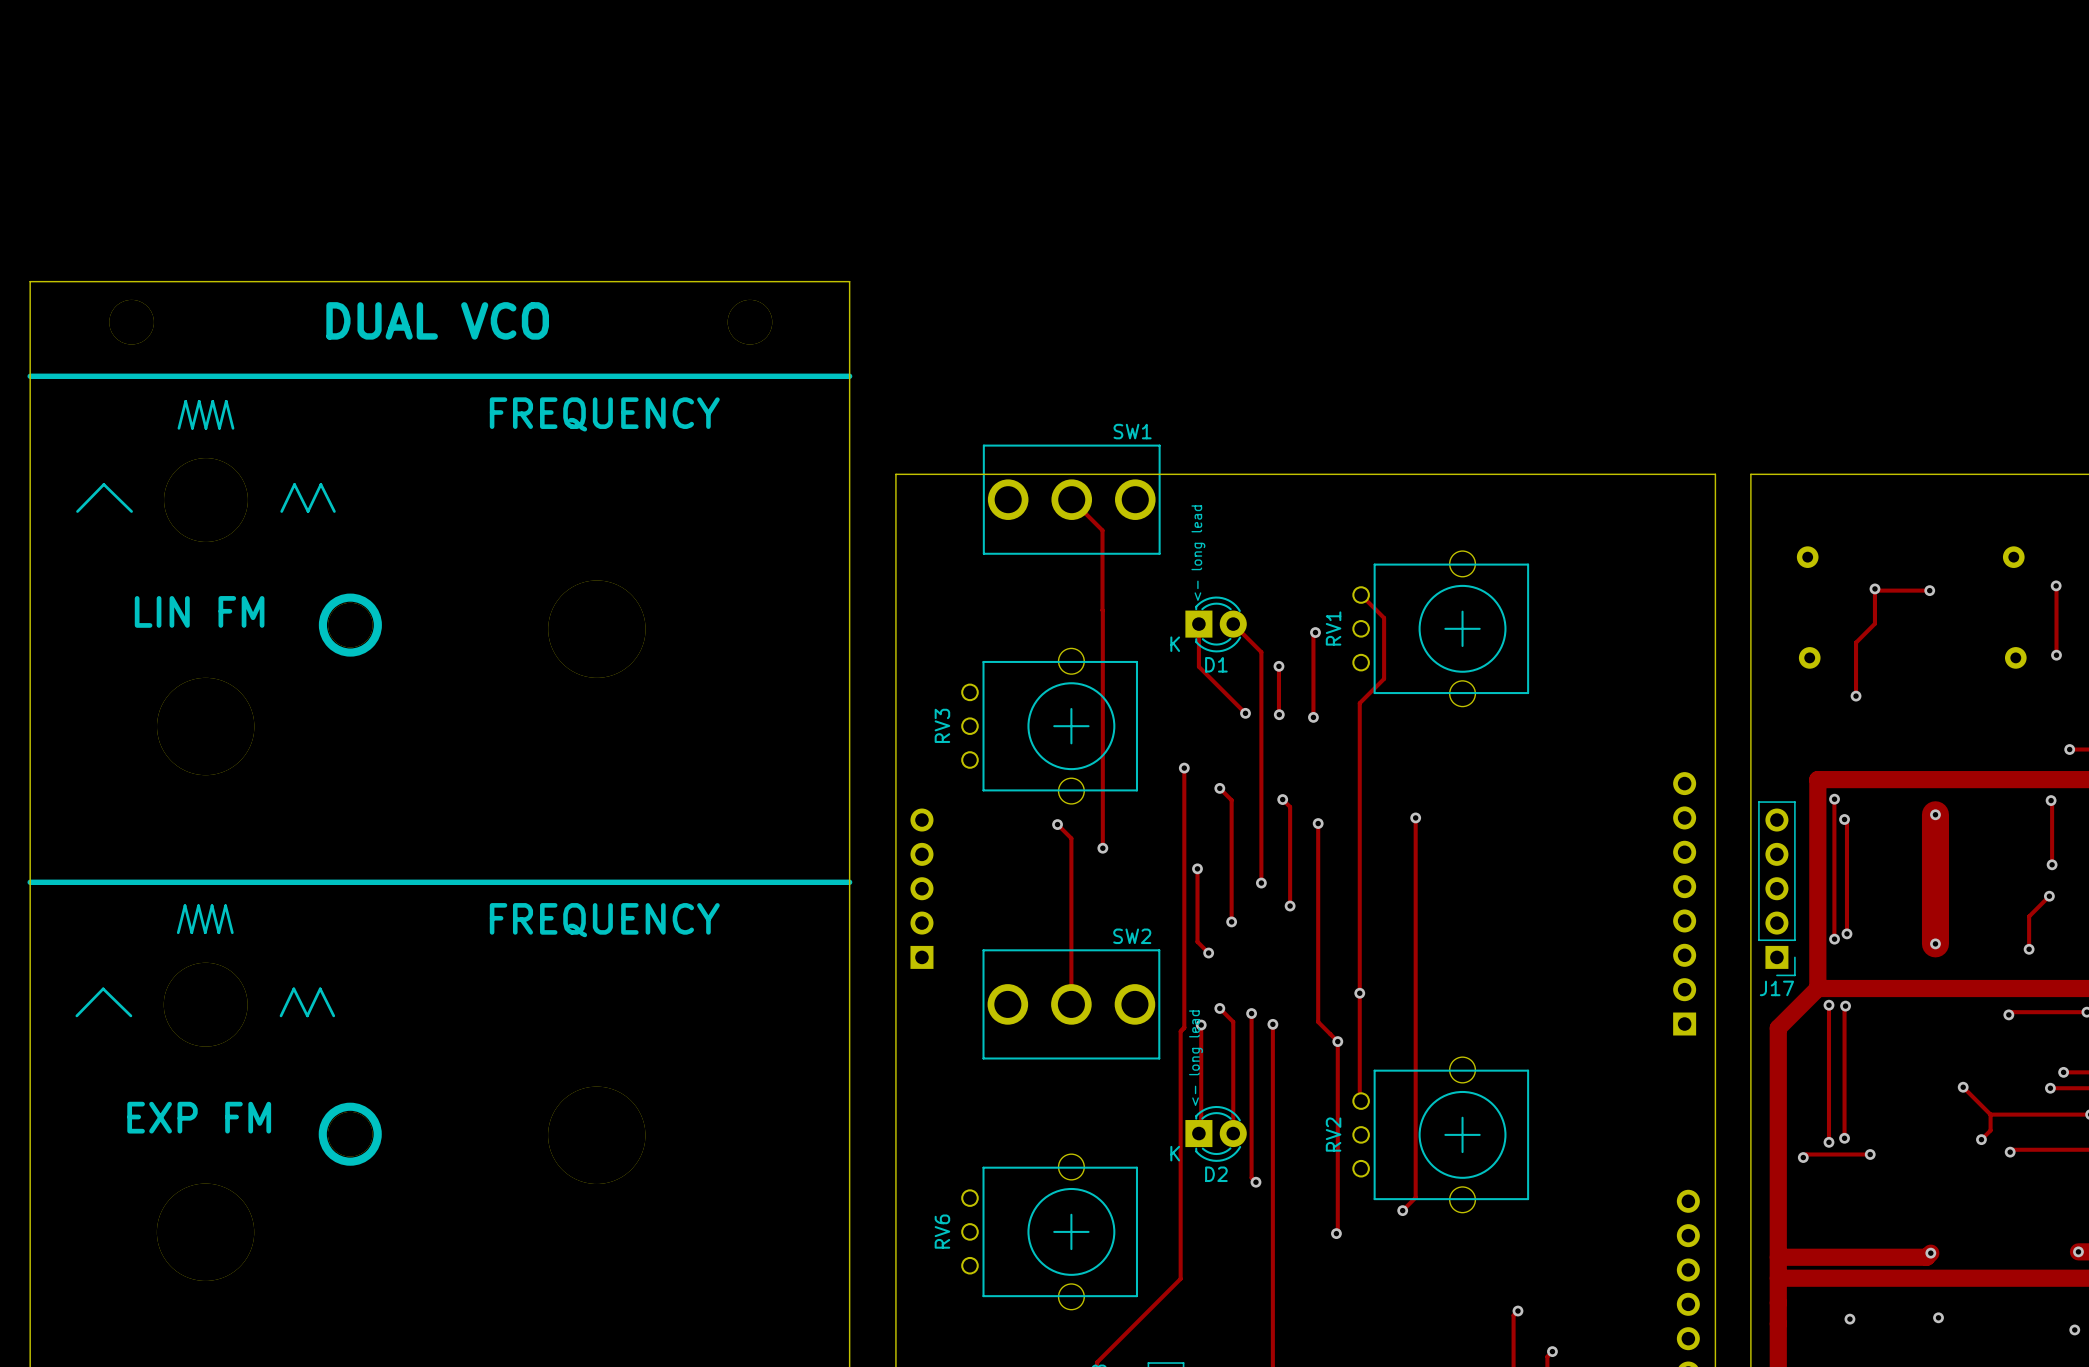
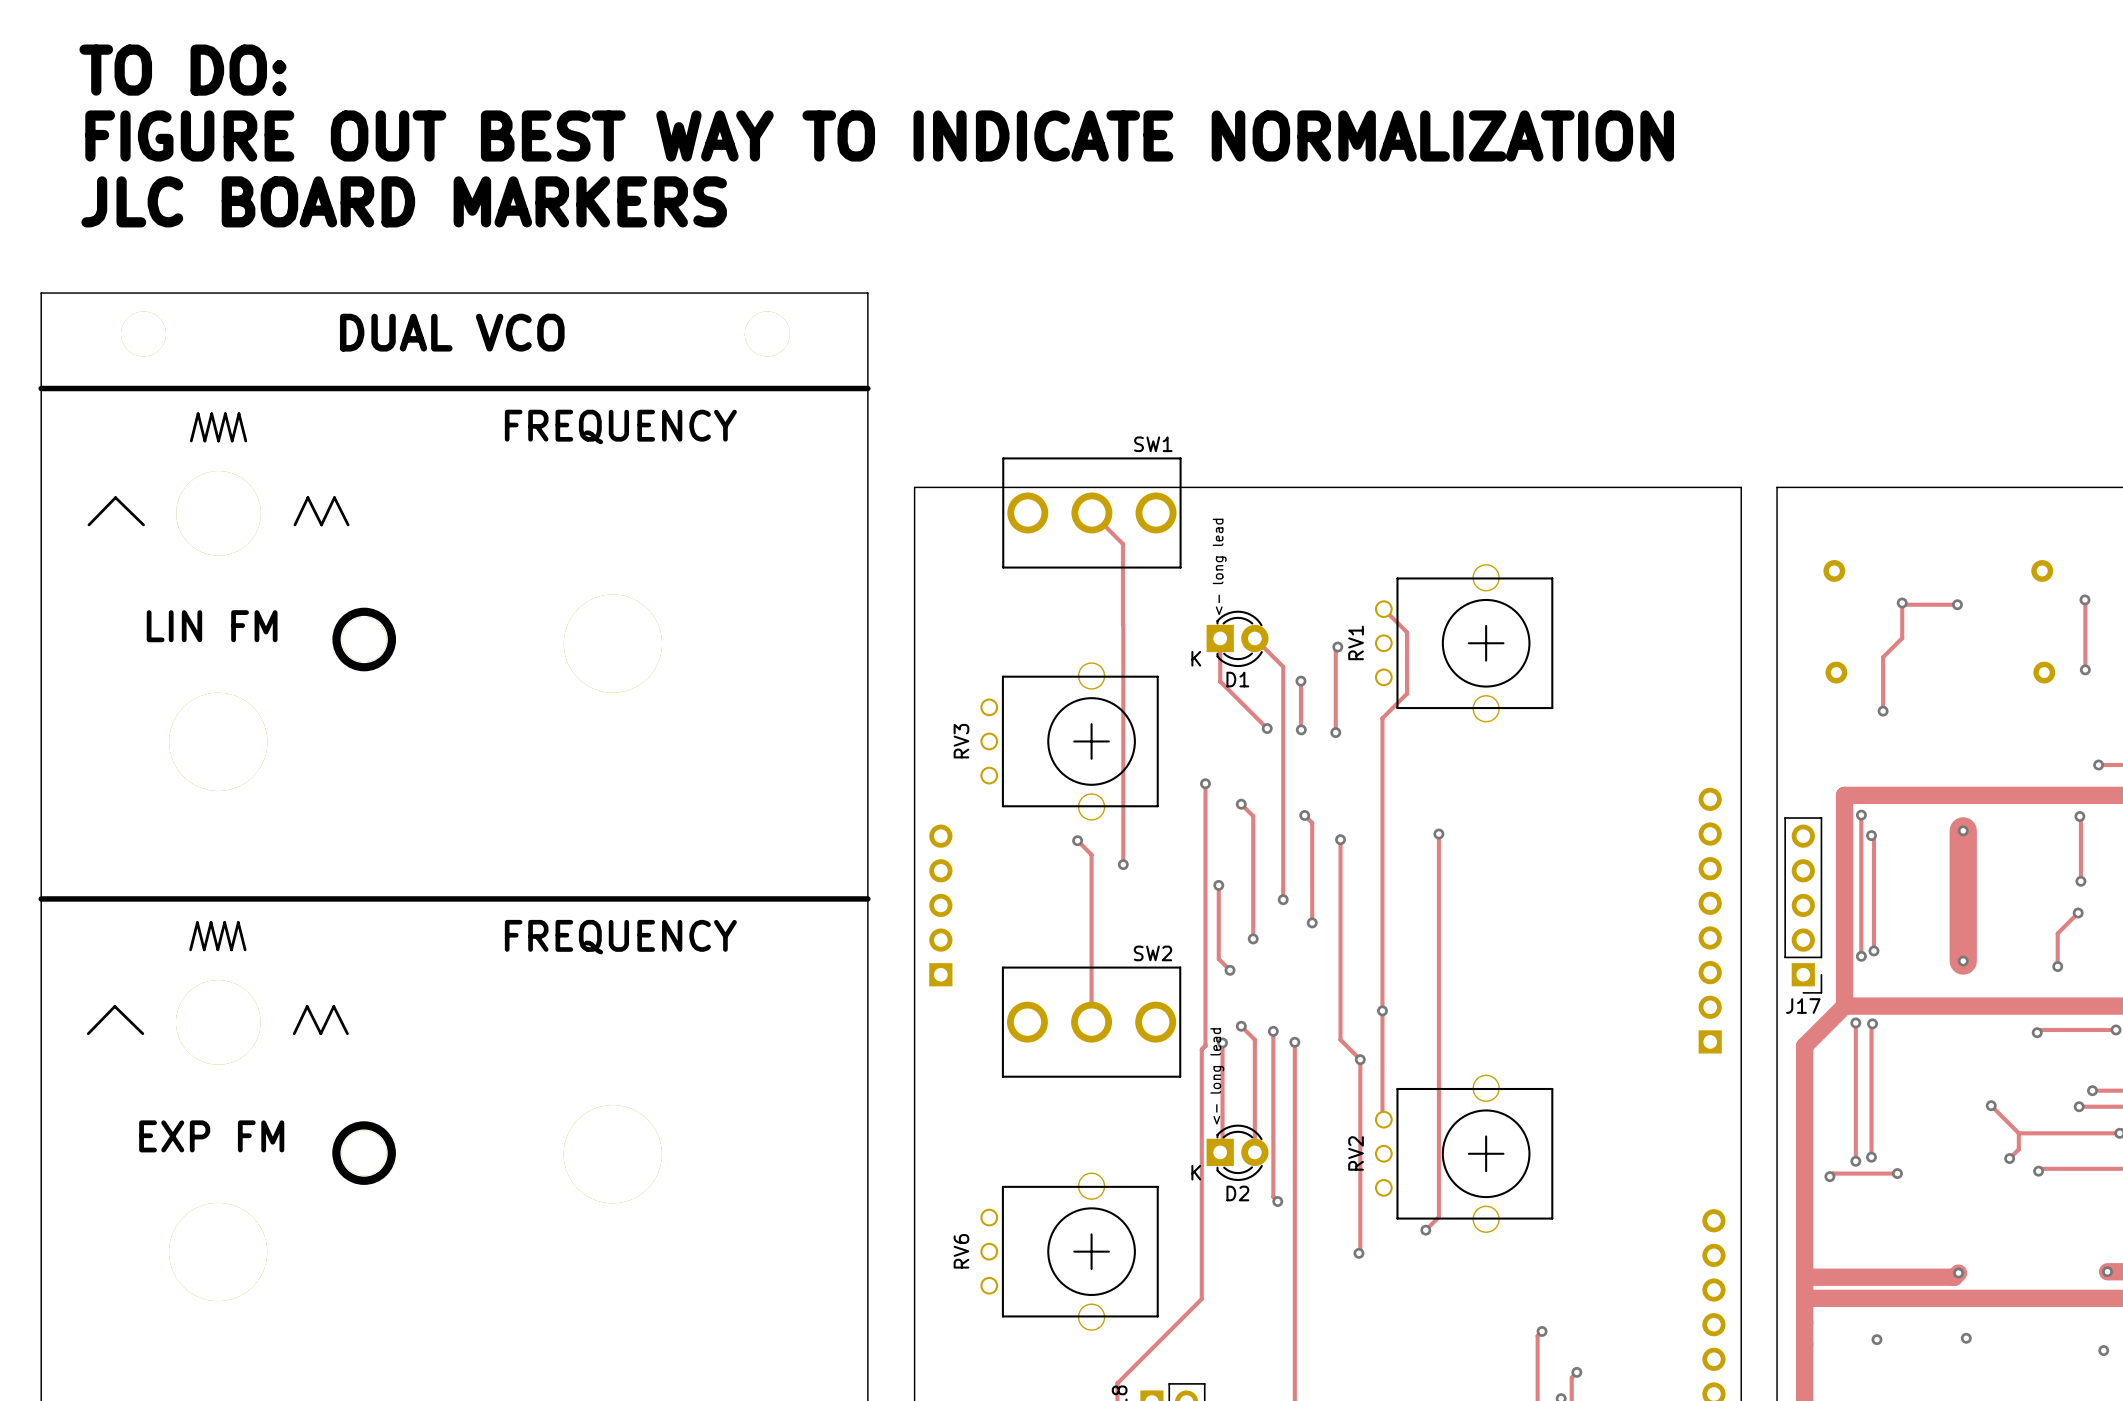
text: none -> TO DO: (182, 70)
text: none -> FIGURE OUT BEST WAY TO INDICATE NORMALIZATION (879, 135)
text: none -> JLC BOARD MARKERS (404, 201)

